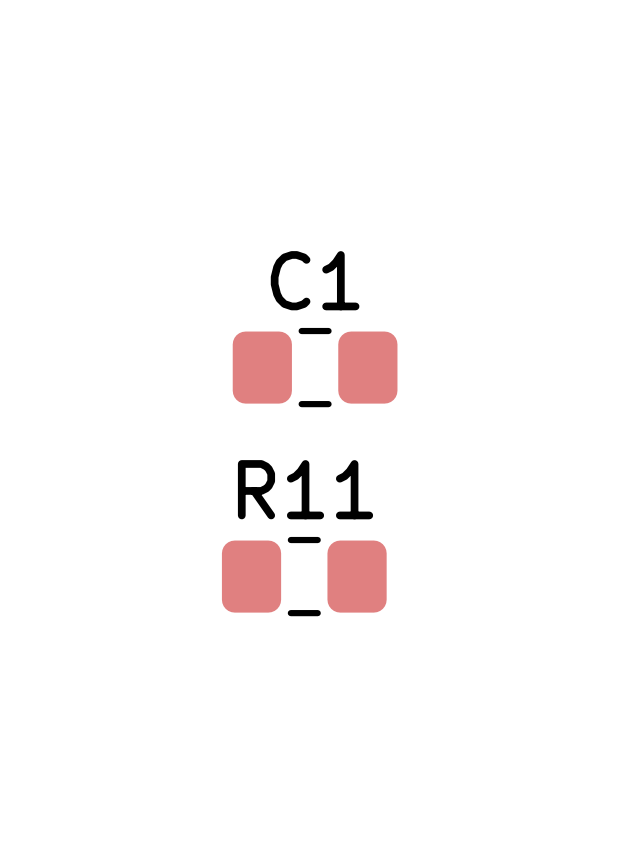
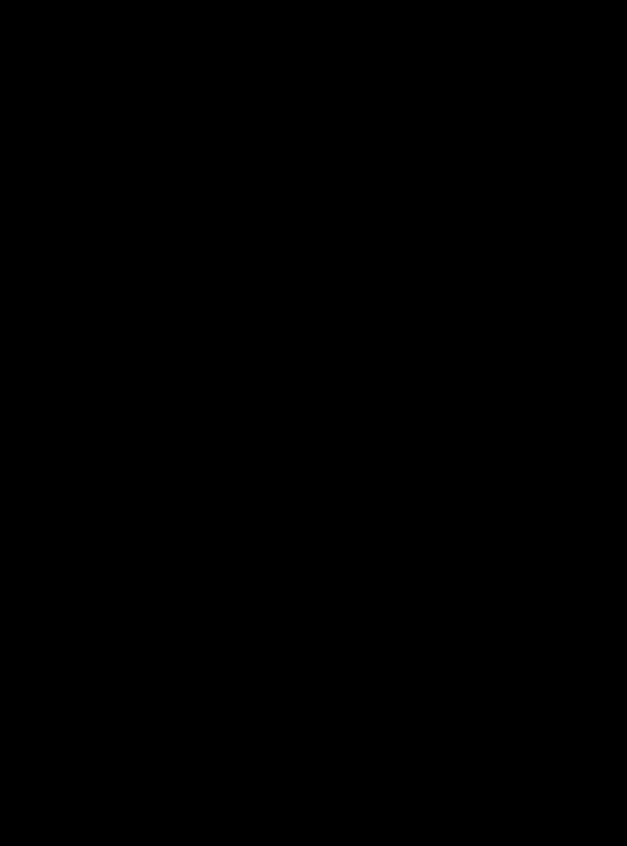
C1: (315, 367) -> none
R11: (304, 576) -> none

